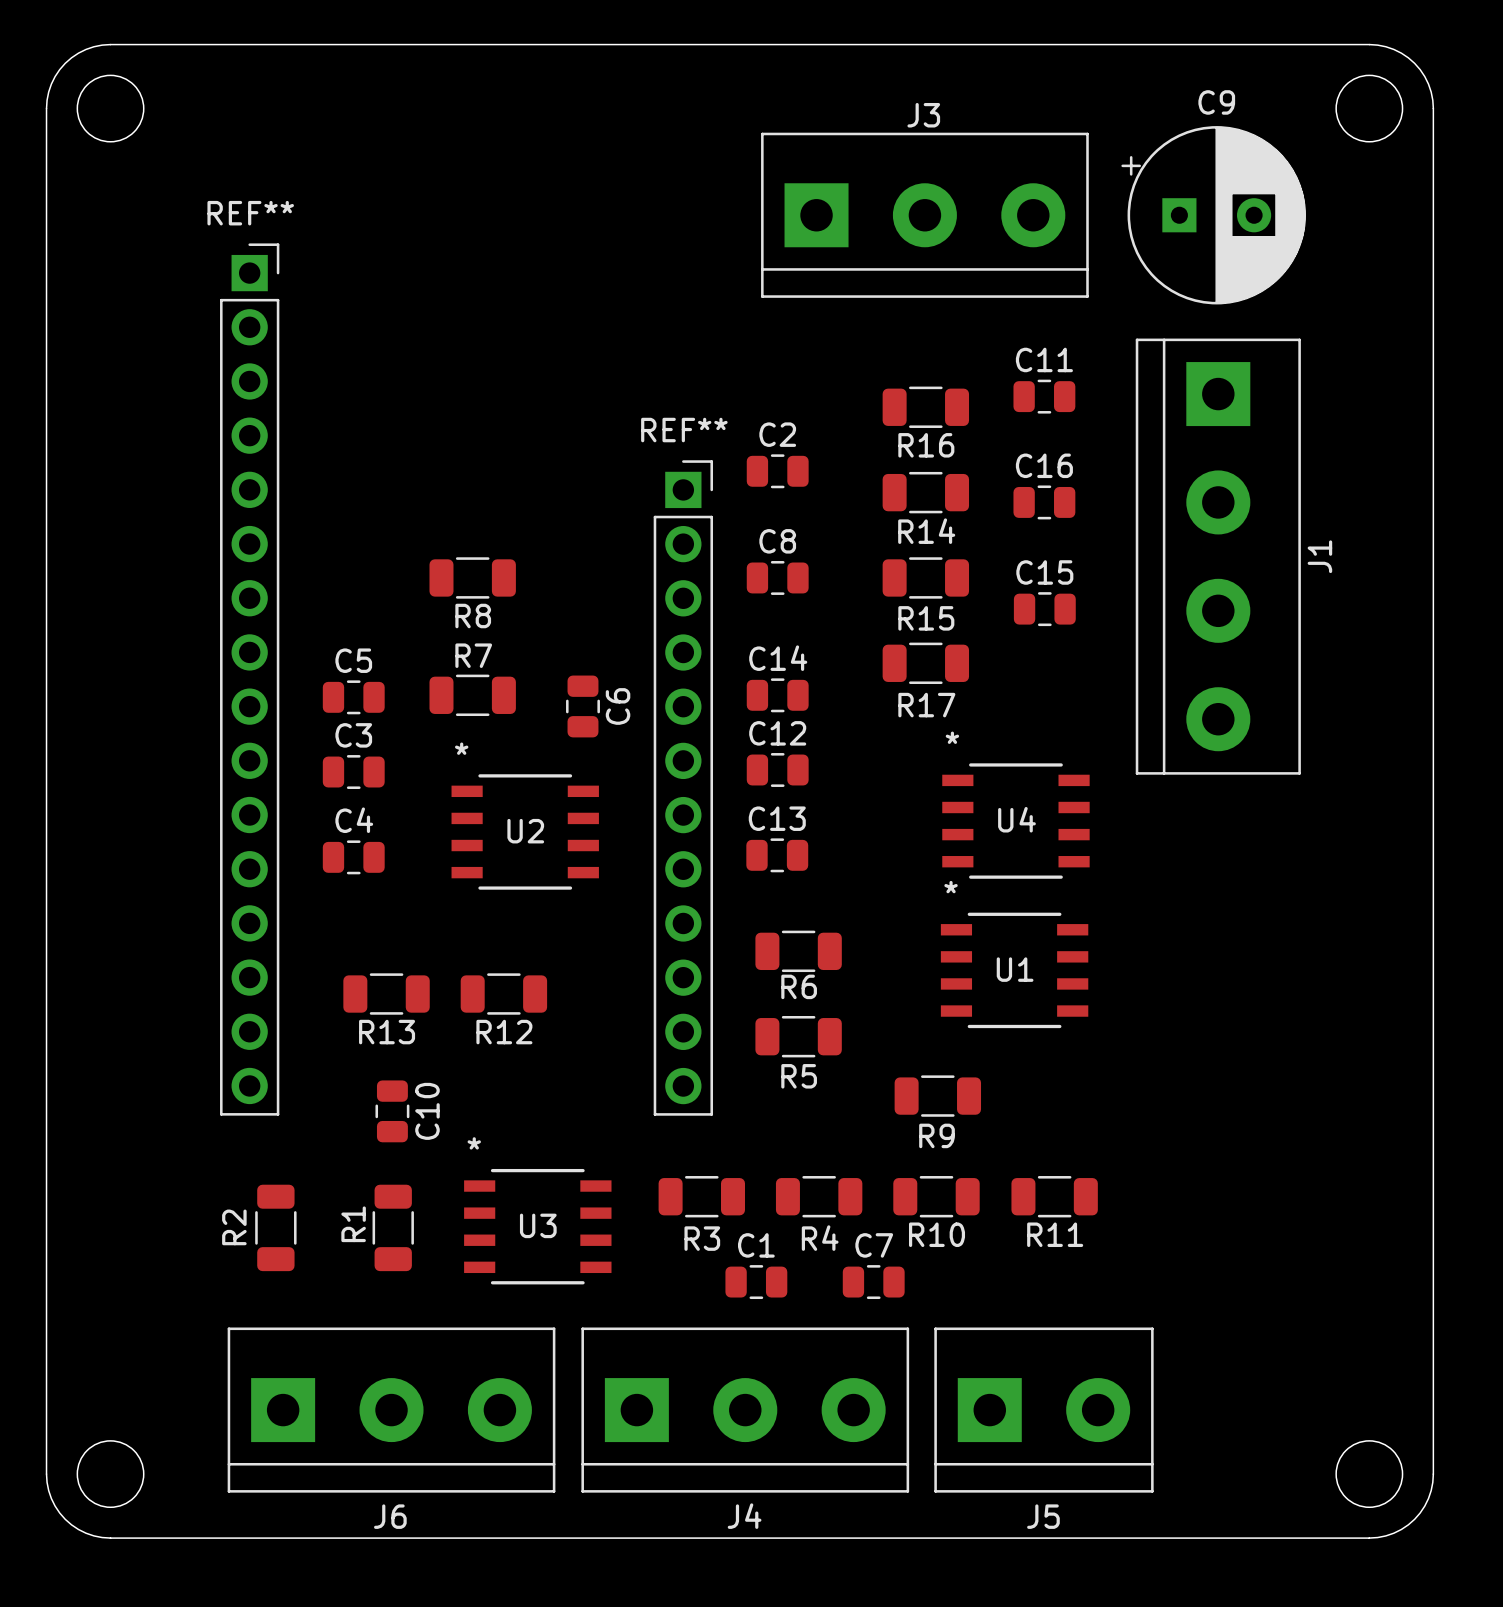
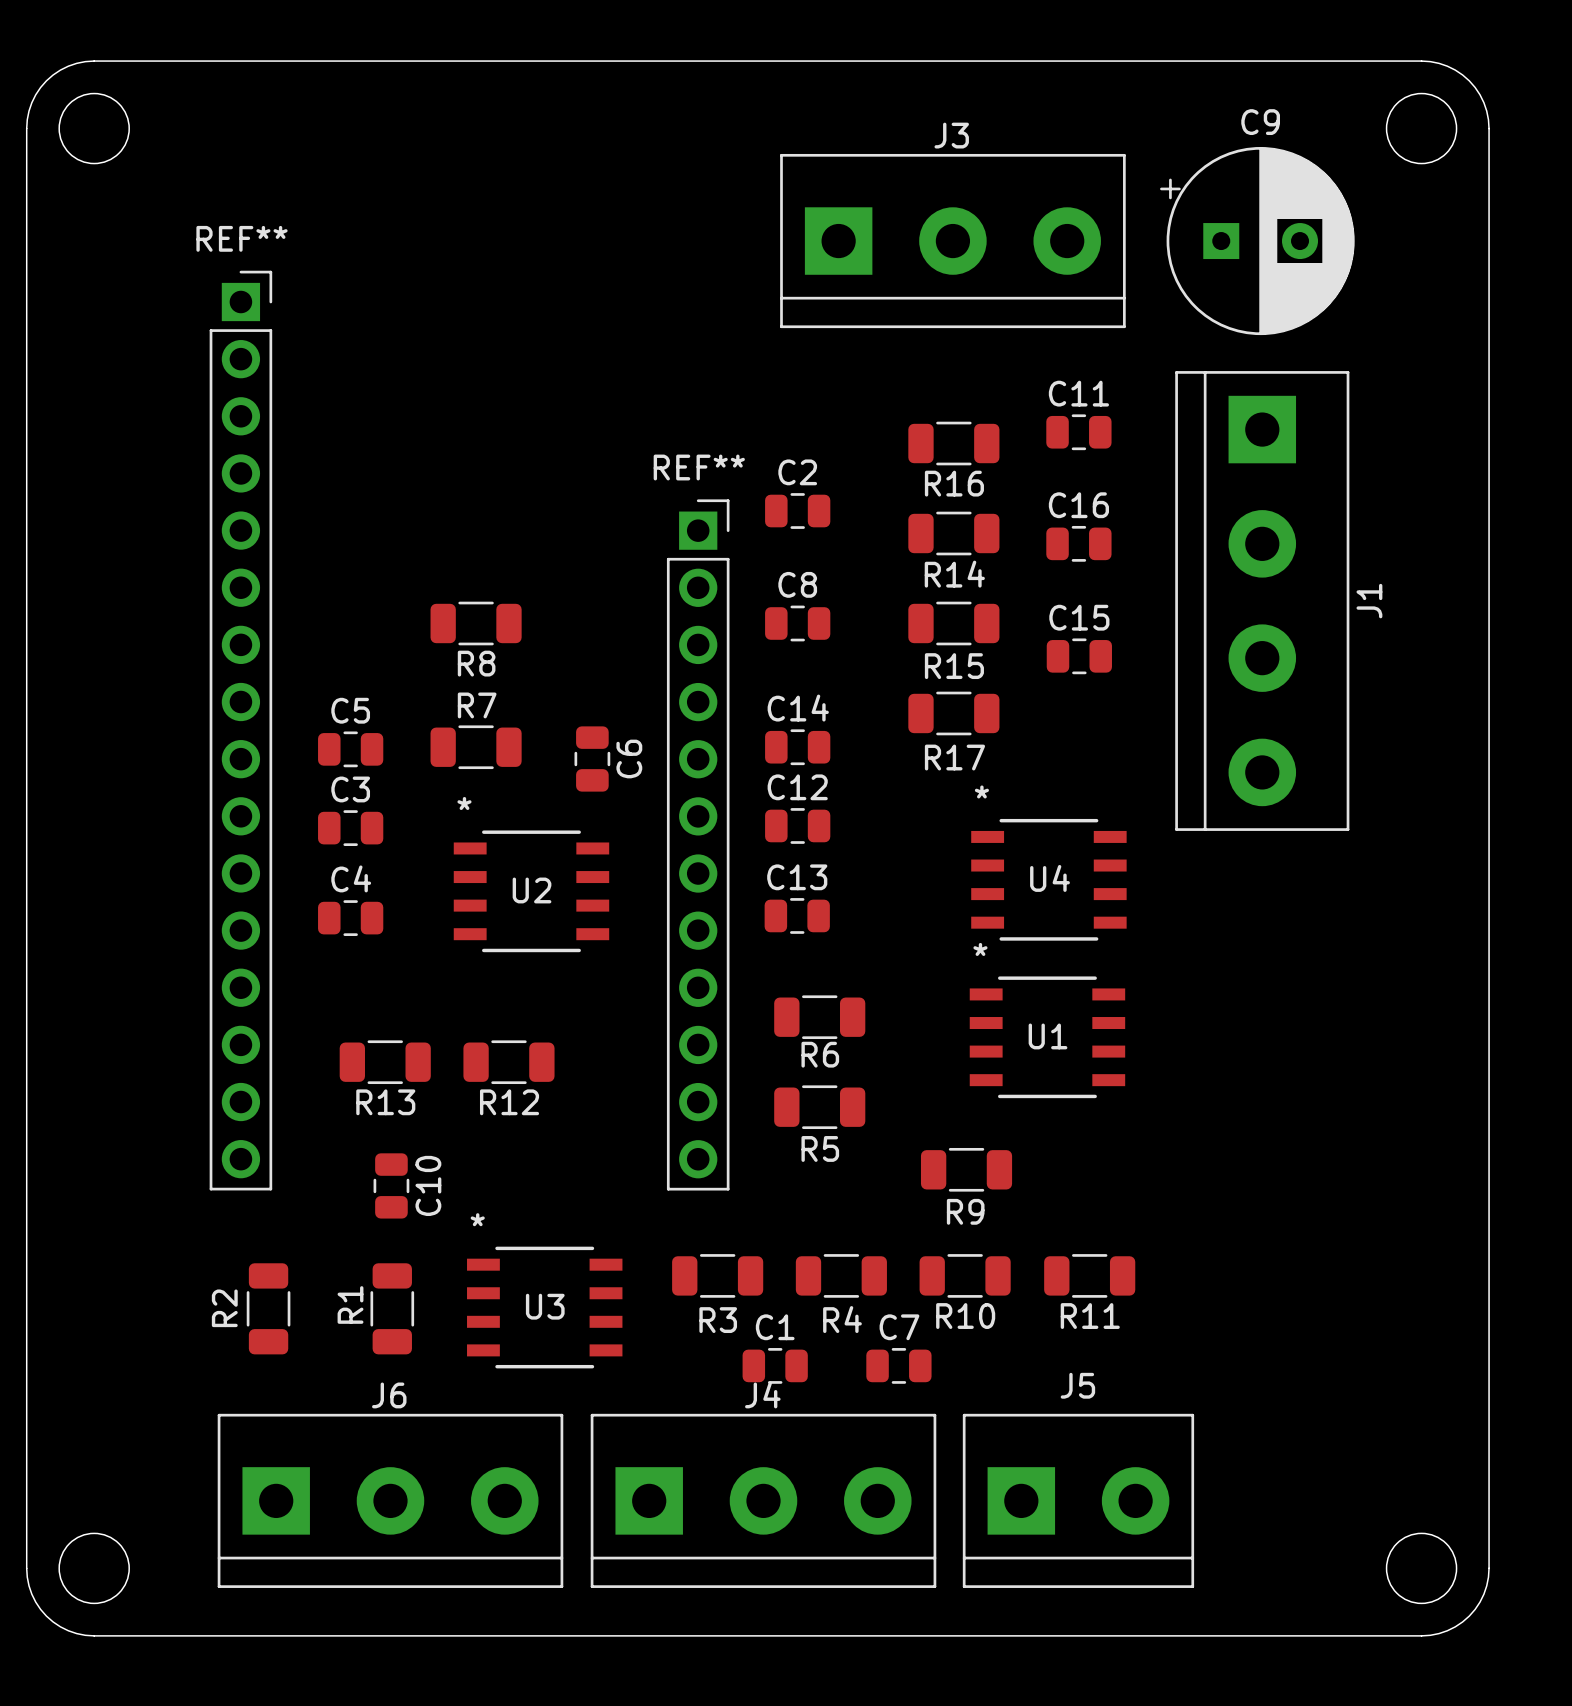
J6 name position: J6 (390, 1516) -> J6 (389, 1395)
J4 name position: J4 (744, 1516) -> J4 (762, 1394)
J5 name position: J5 (1043, 1516) -> J5 (1077, 1385)

